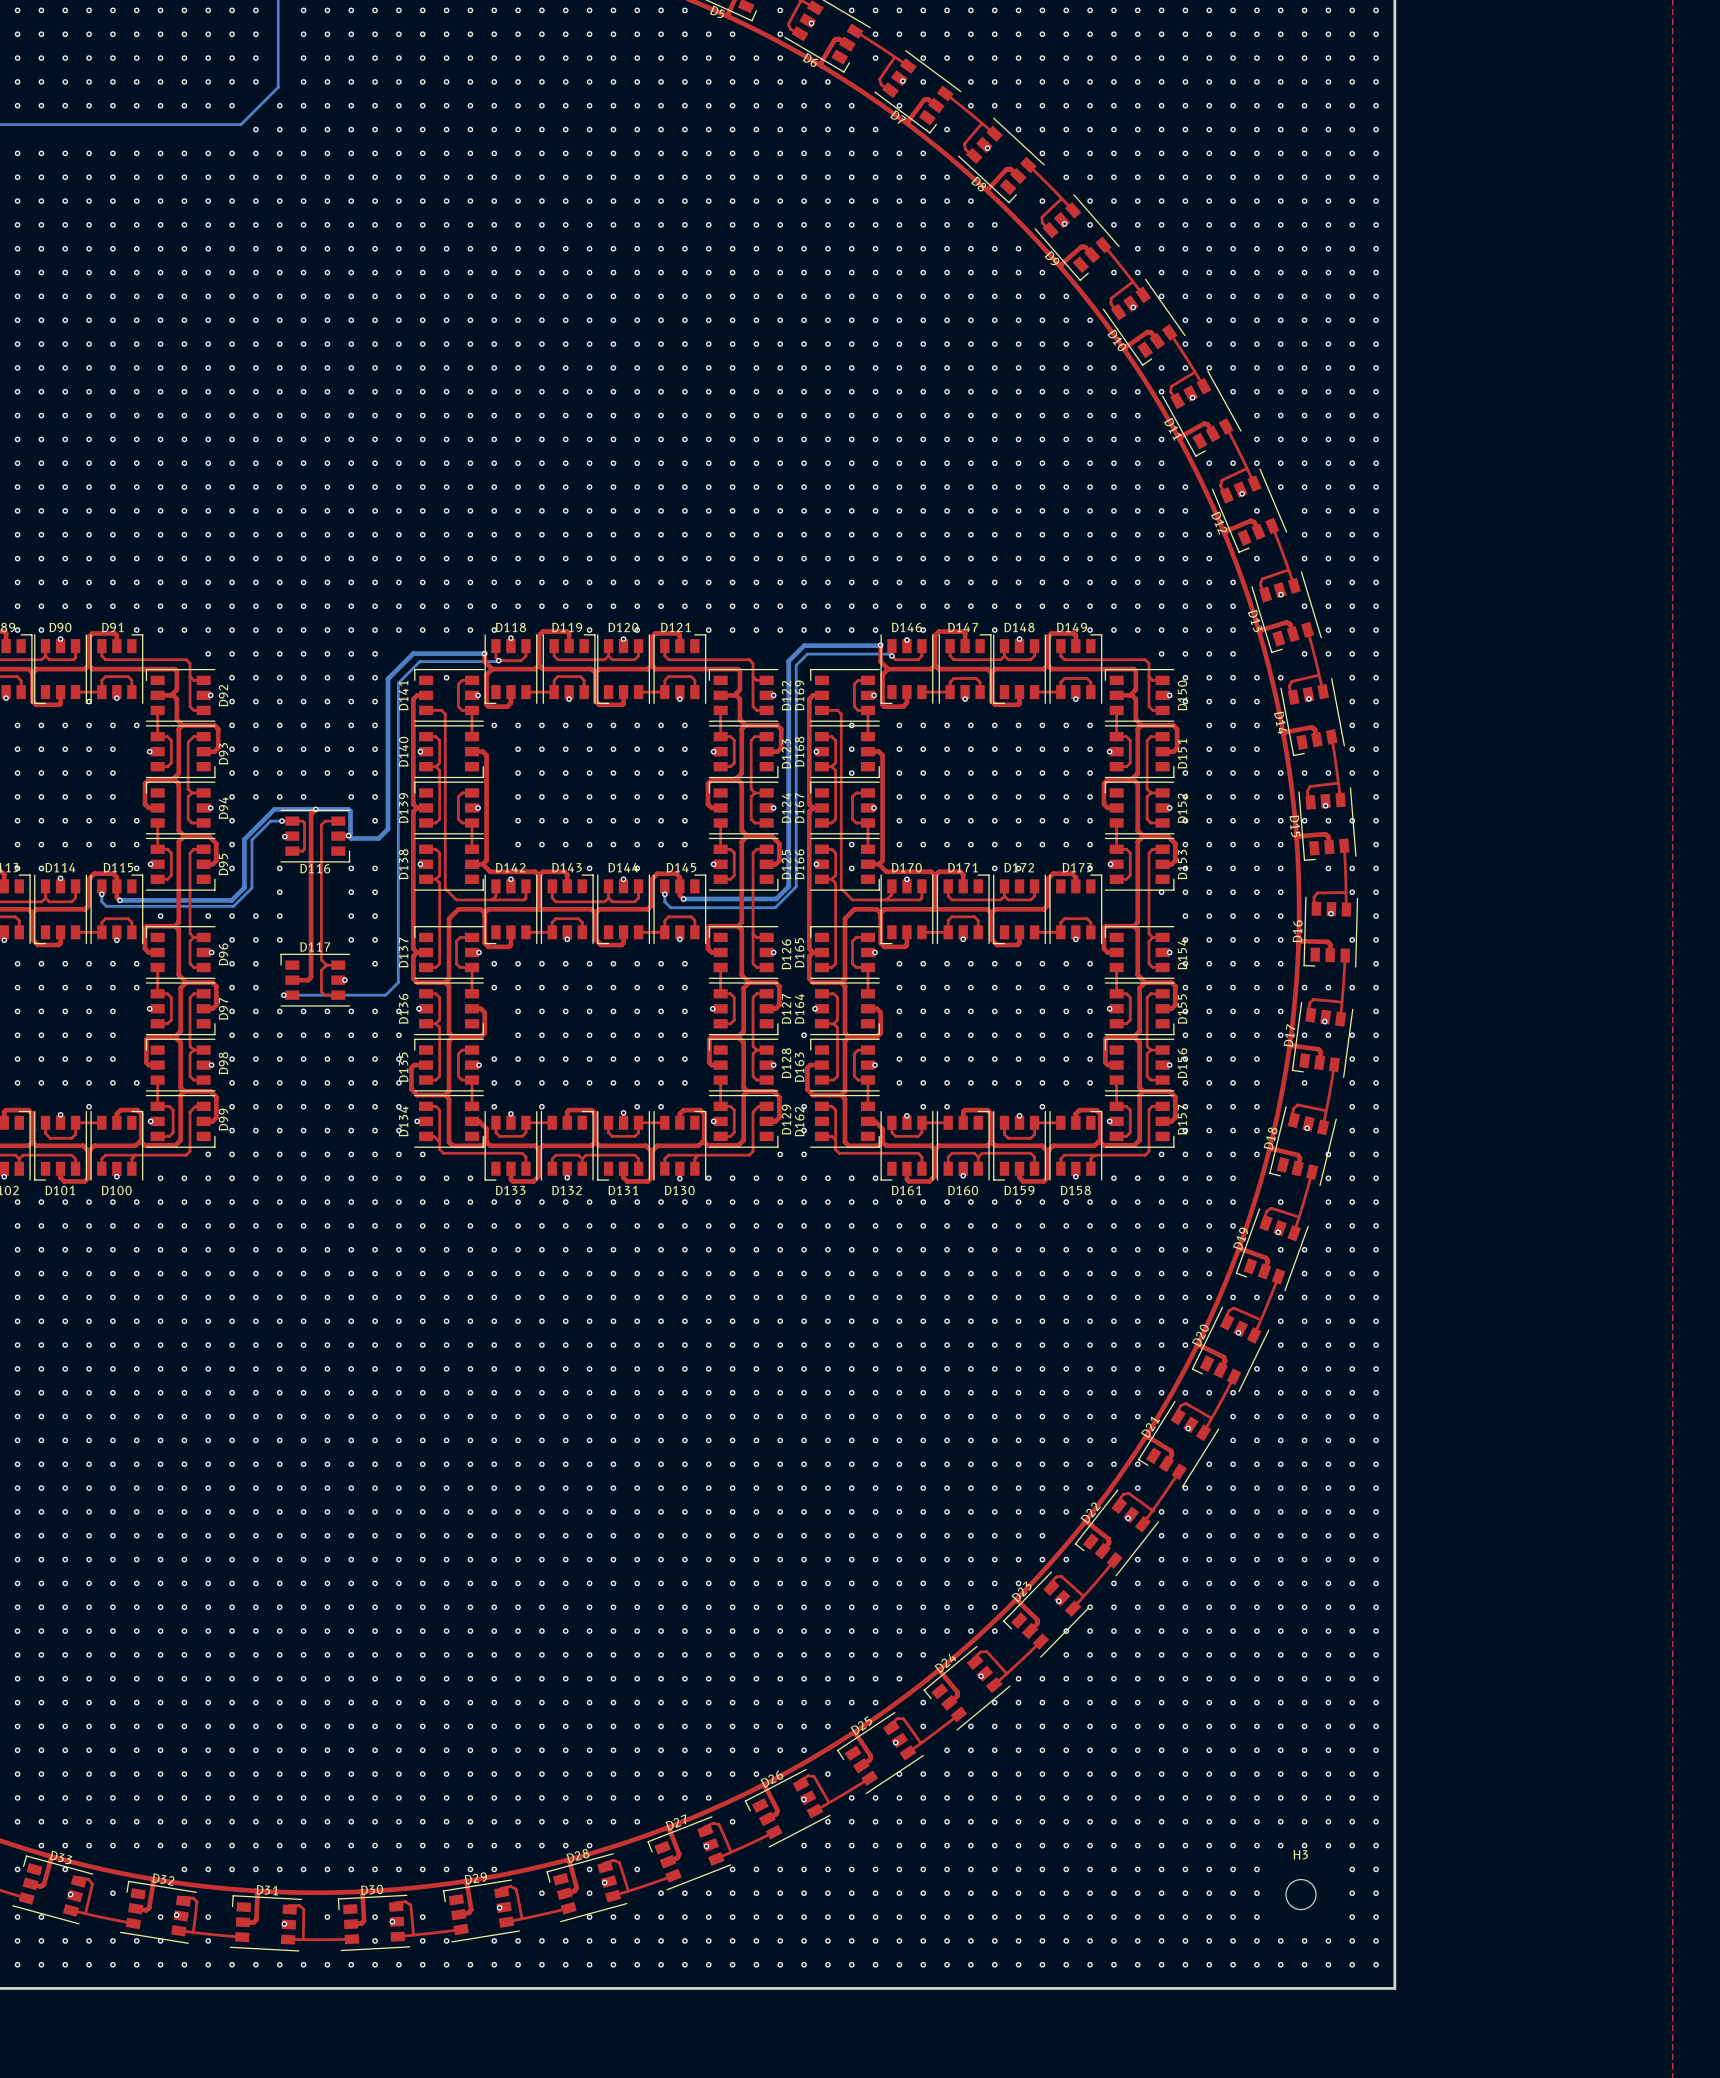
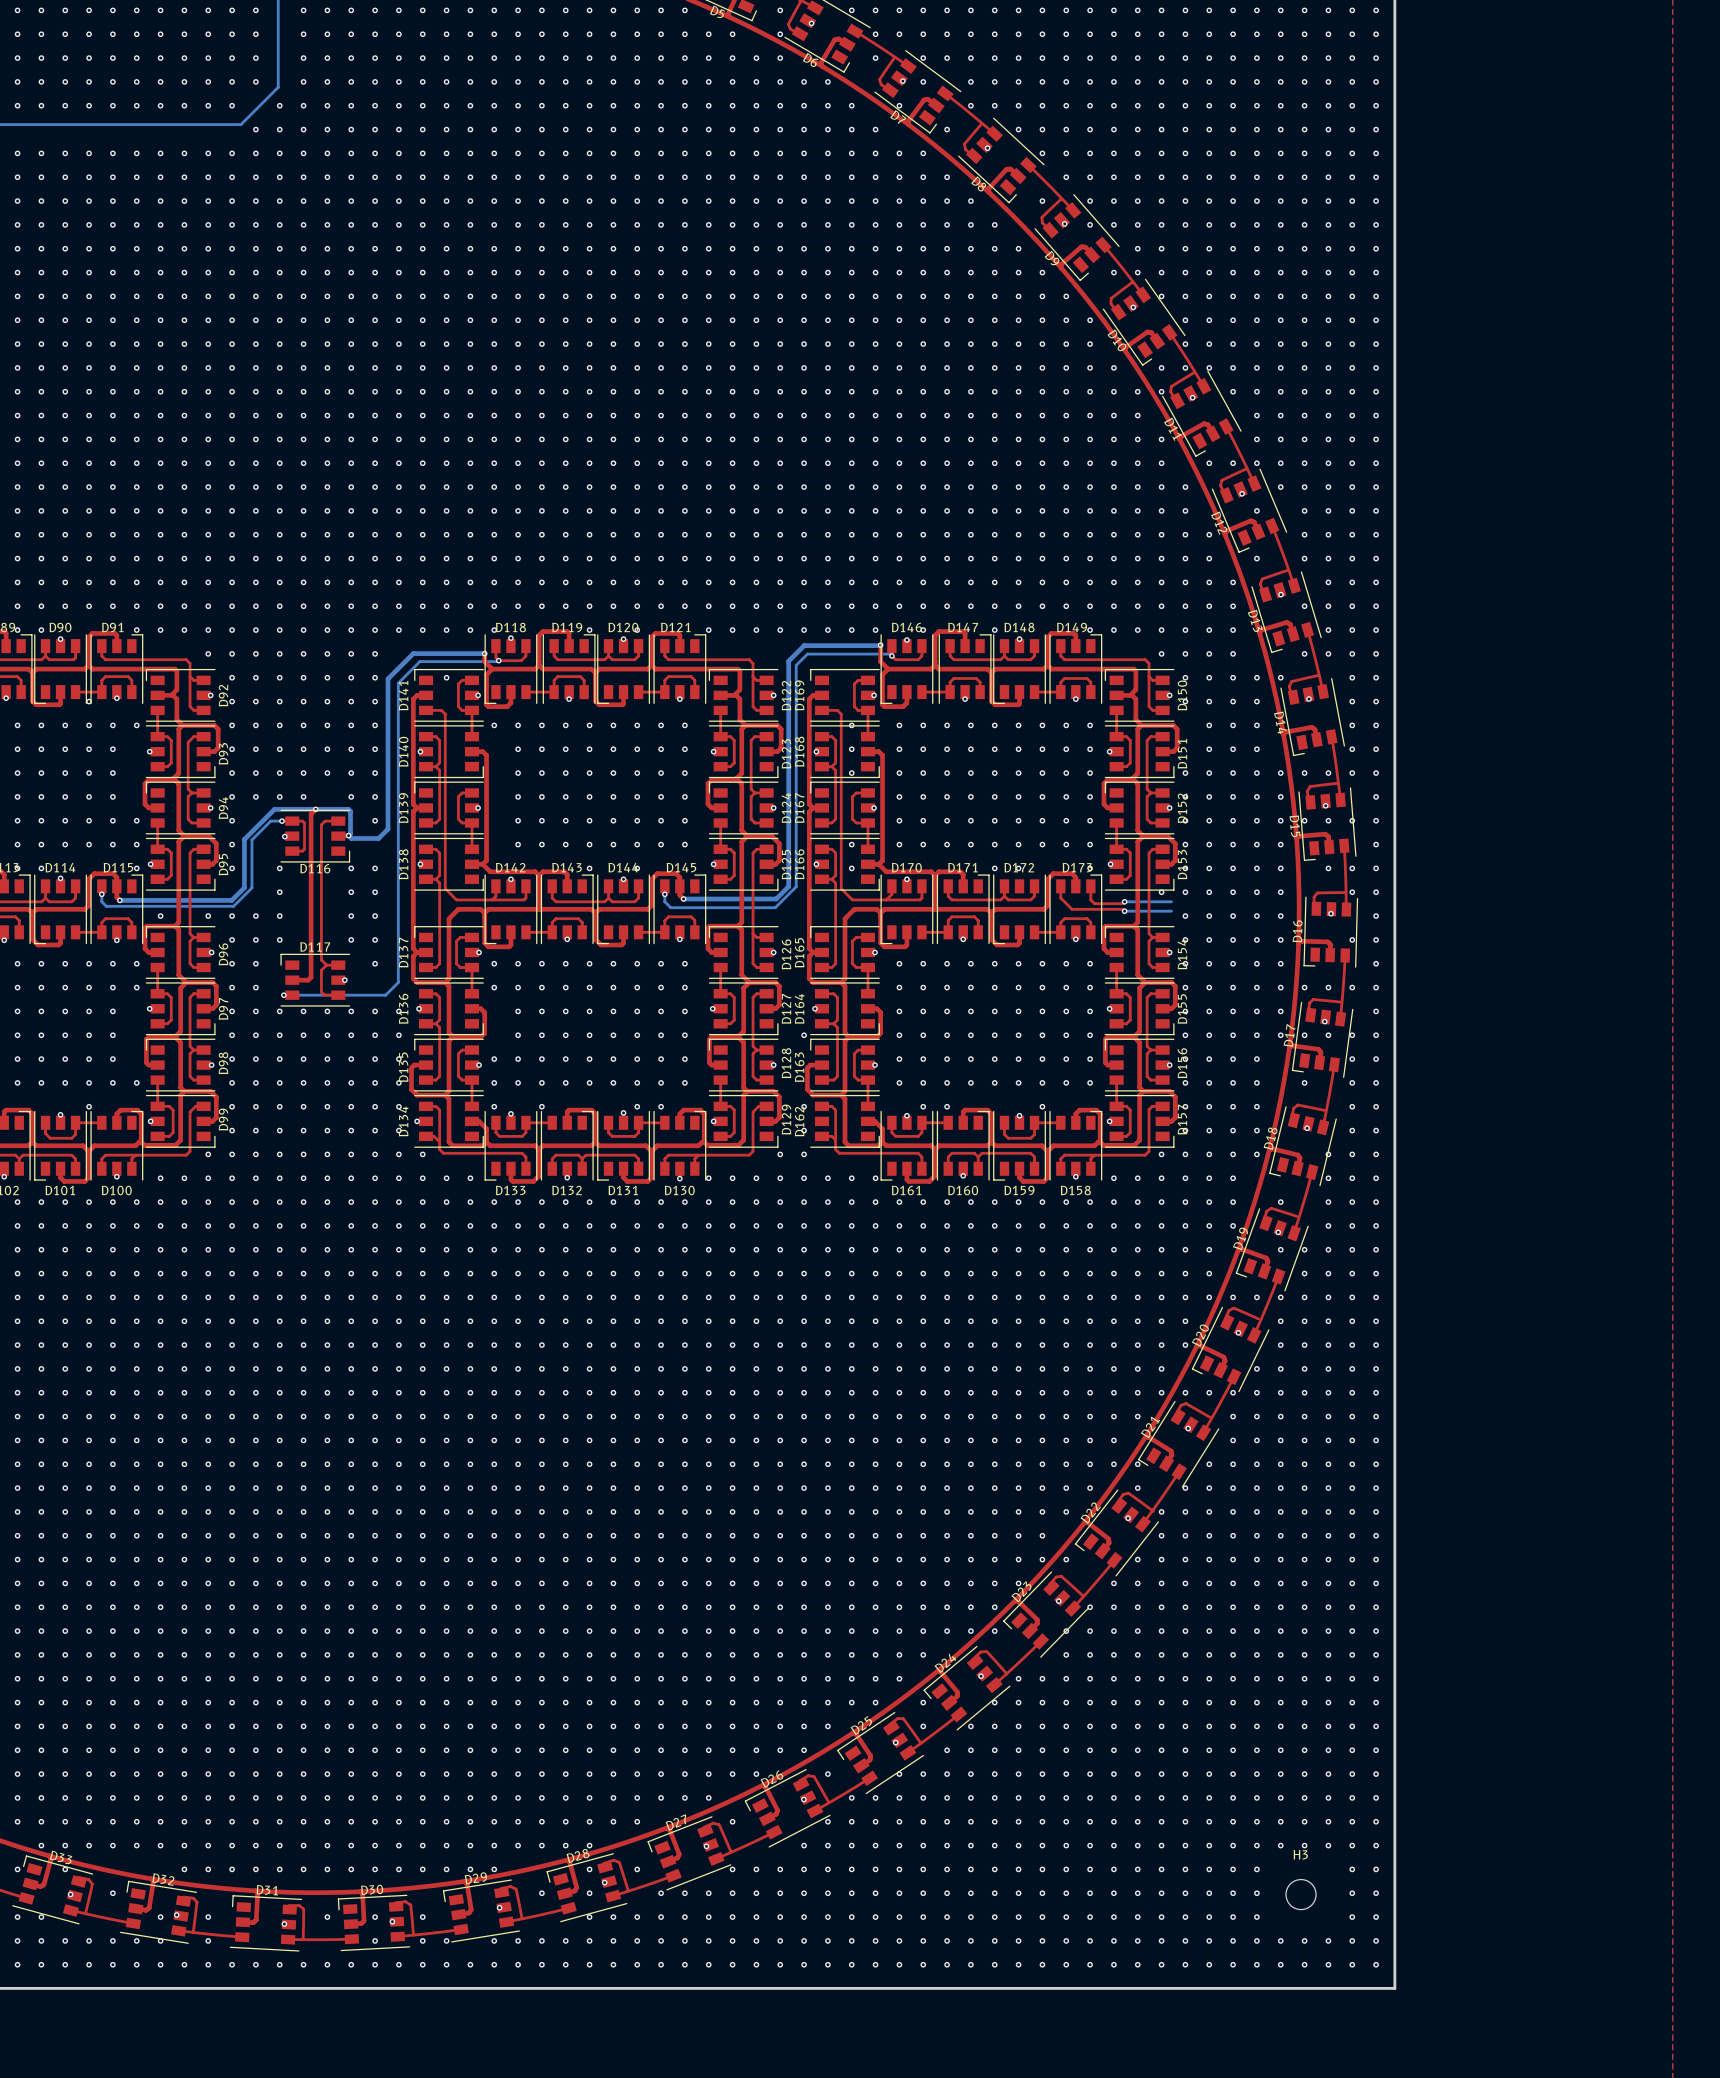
top track: none -> (1060, 886) (1060, 898) (1072, 909) (1122, 909) (1124, 911)
top track: none -> (1090, 886) (1090, 899) (1094, 903) (1122, 903) (1124, 901)
bottom track: none -> (1124, 901) (1171, 901)
via: none -> (1124, 901)
bottom track: none -> (1124, 911) (1171, 911)
via: none -> (1124, 911)

